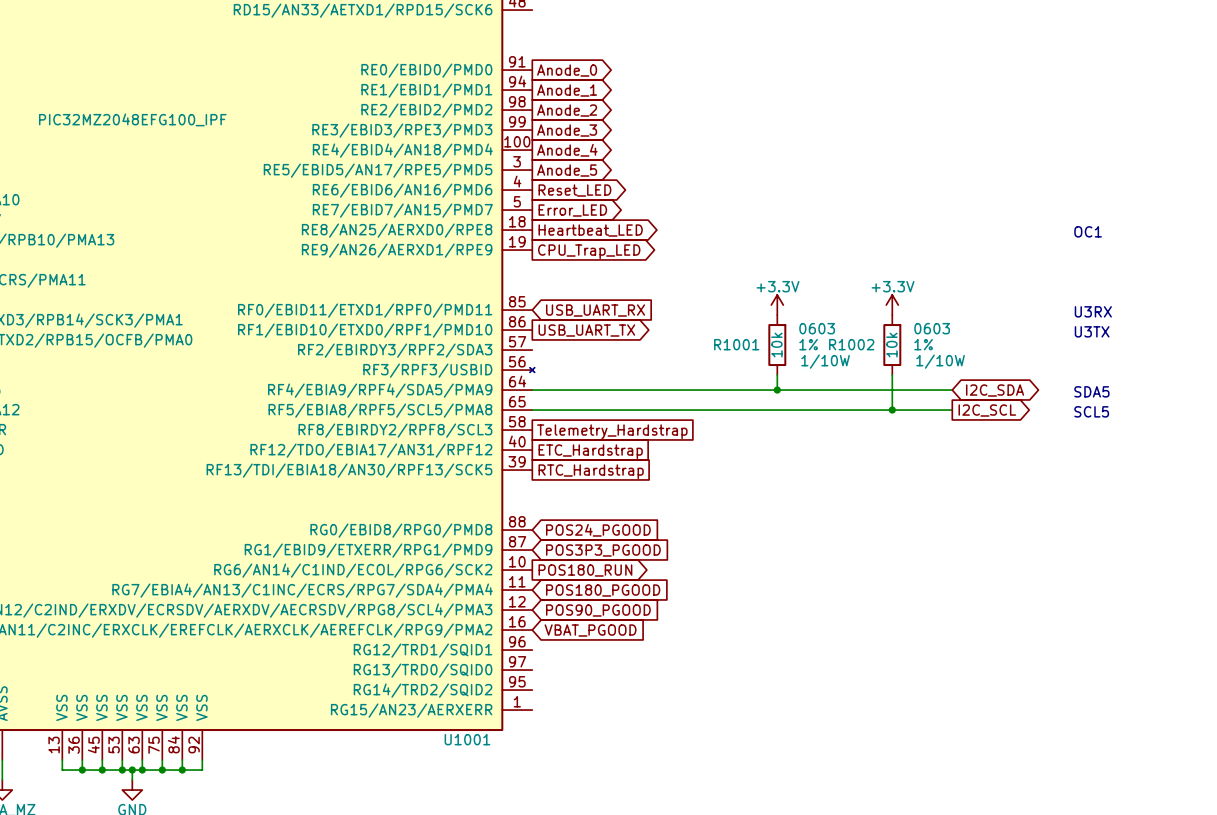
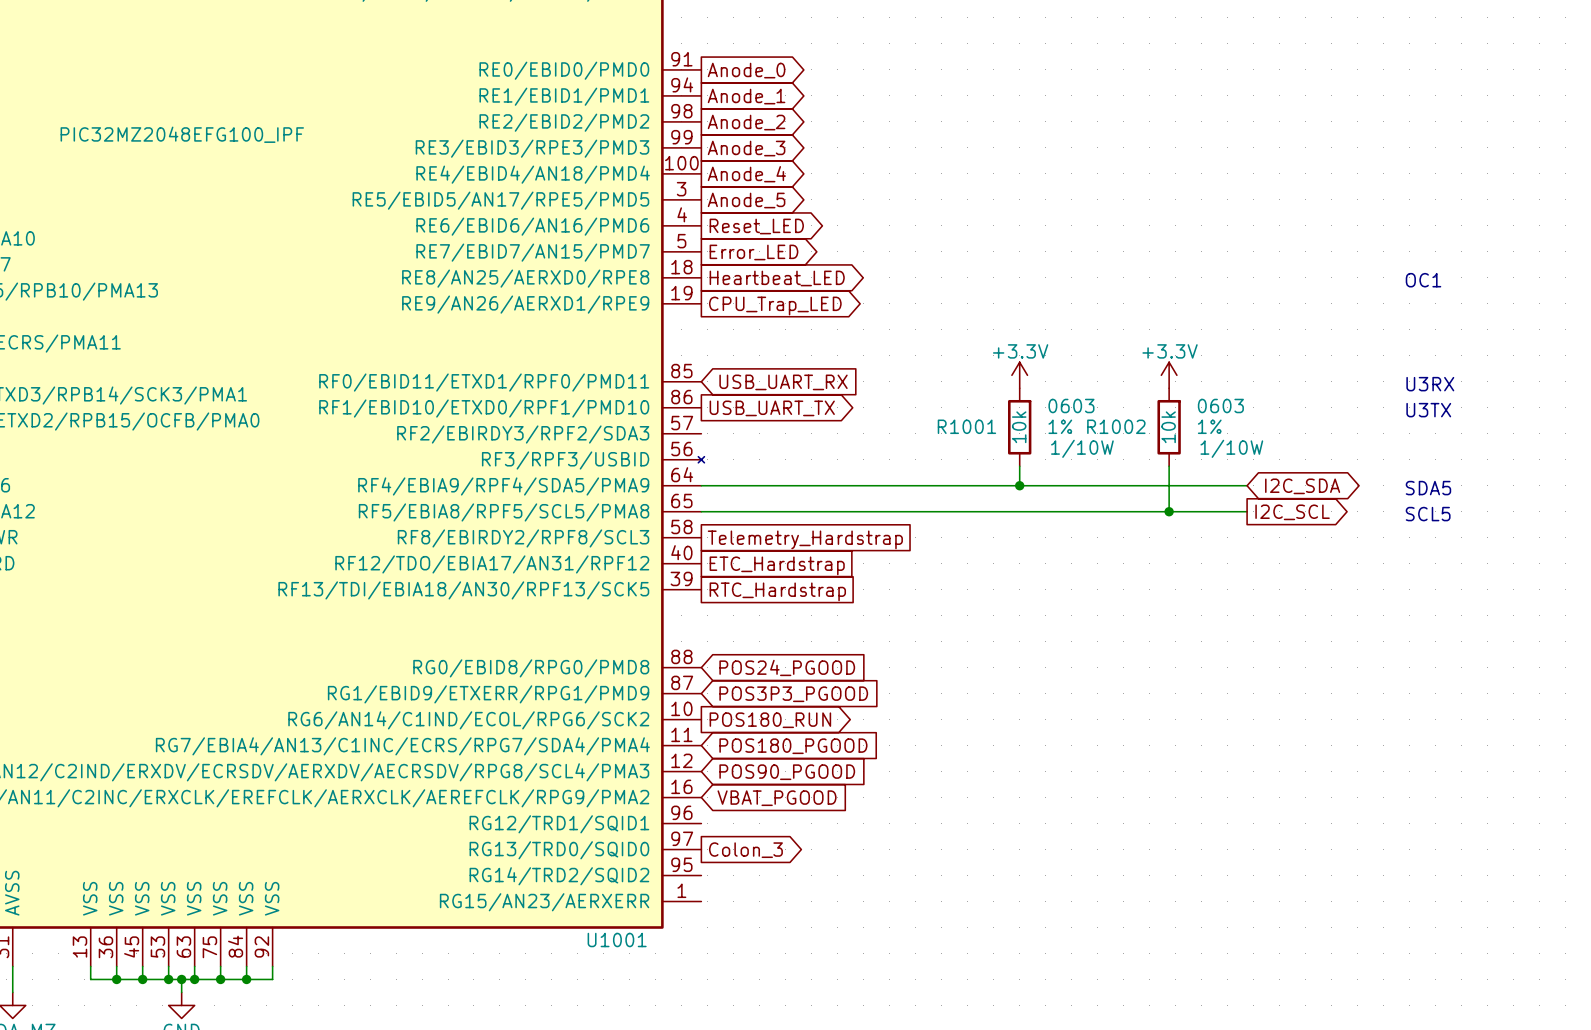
global label: none -> Colon_3 (745, 850)

